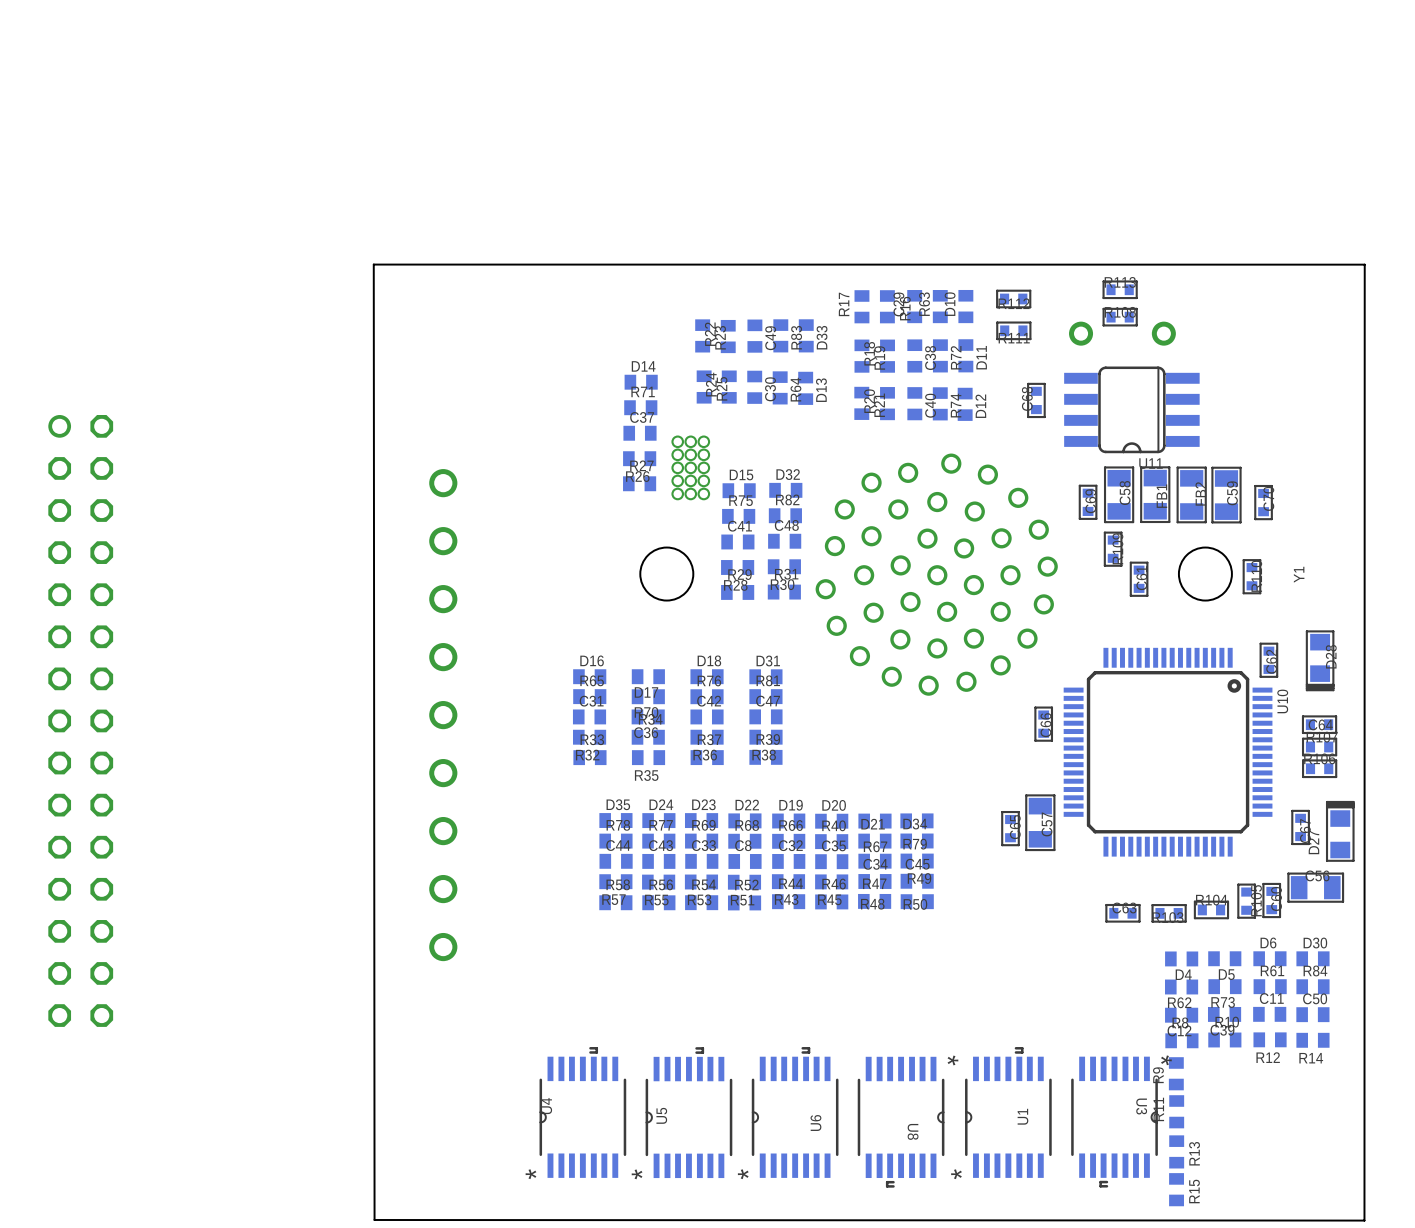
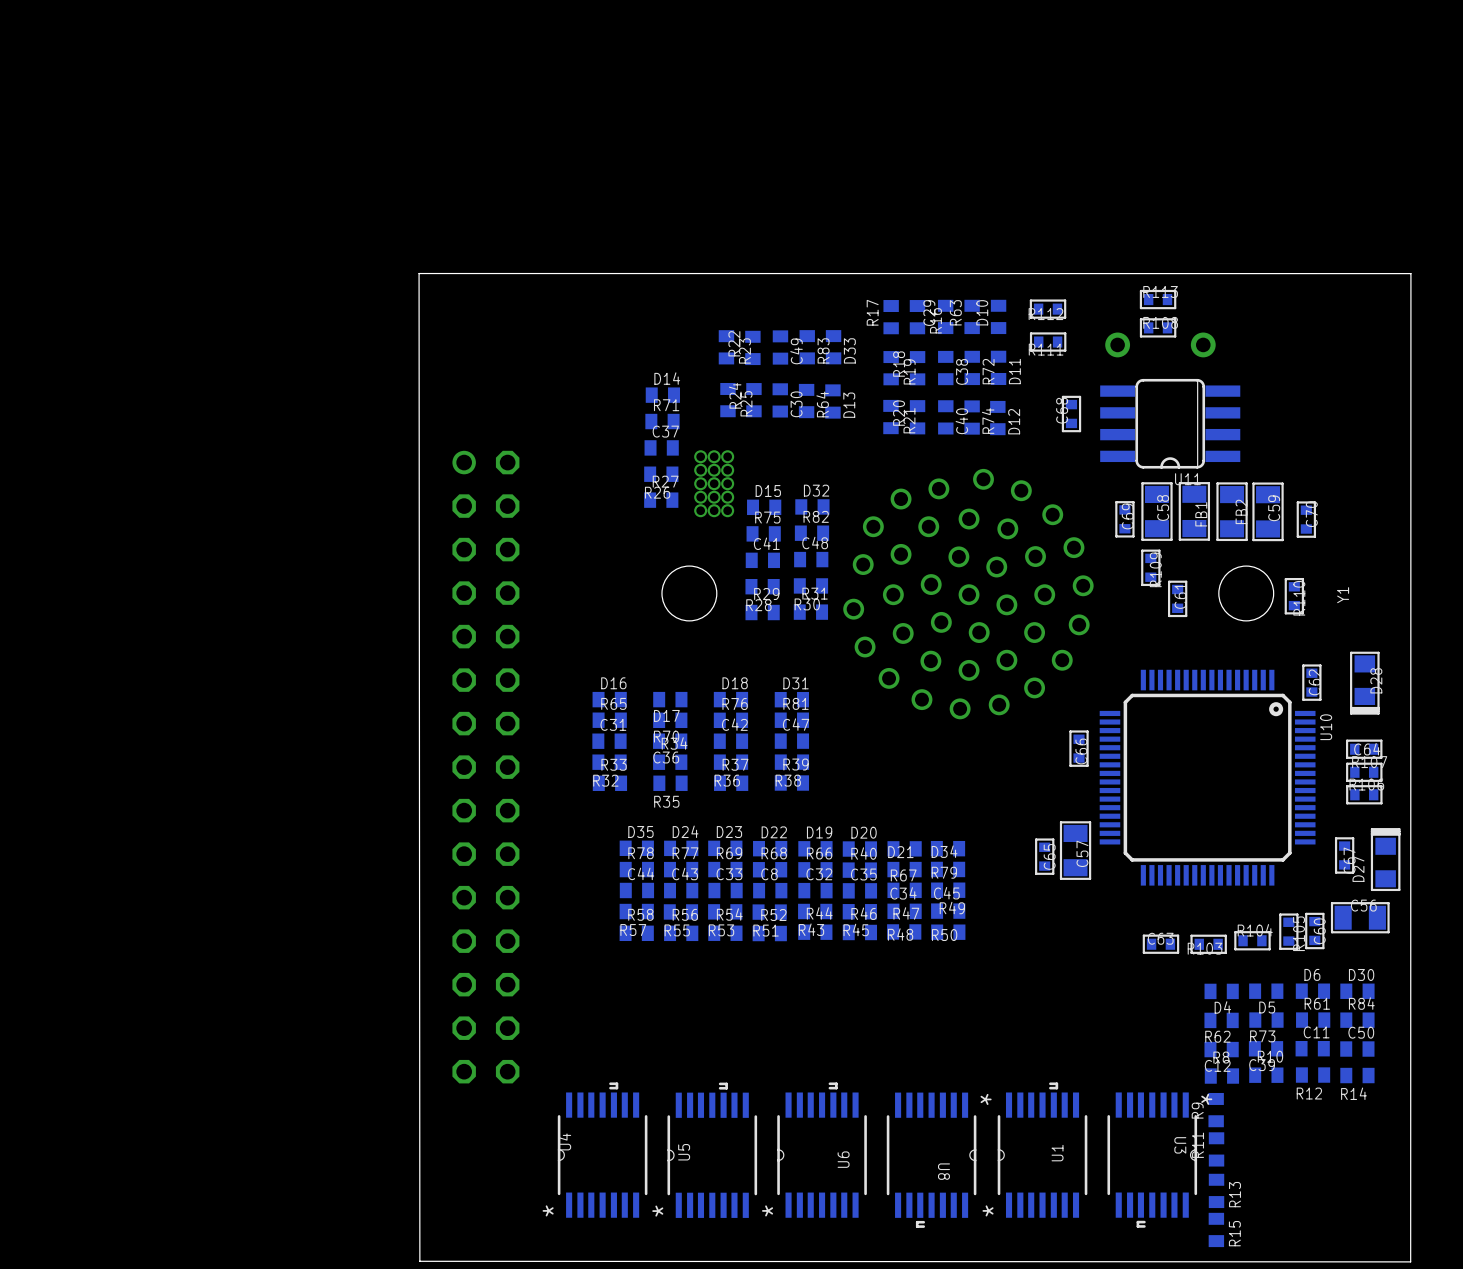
board edge: (405, 264) (373, 264) (374, 1219) (406, 1219) -> (419, 273) (419, 1261)
part: (443, 715) -> none
part position: (80, 720) -> (485, 767)

